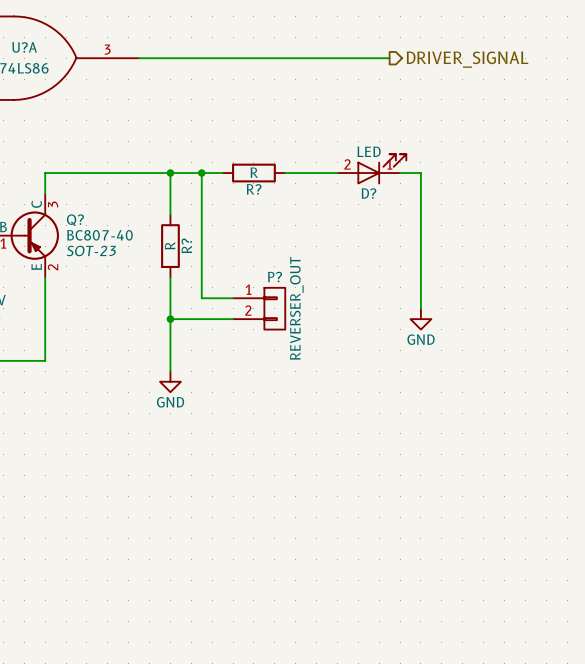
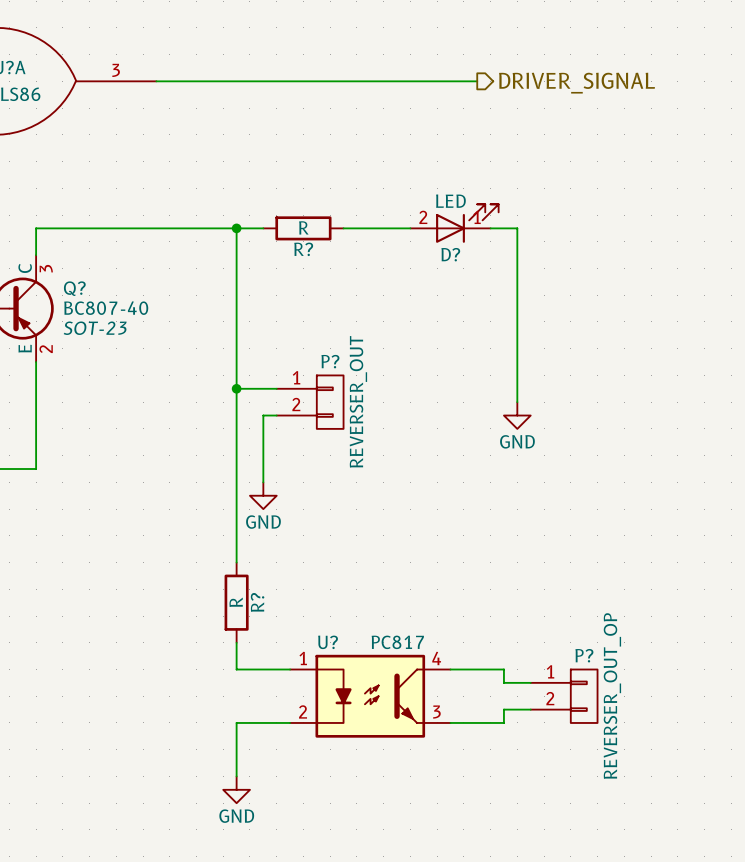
wire: (170, 173) (170, 214) -> none
junction: (170, 173) -> none
R?: R (170, 246) -> none
wire: (170, 277) (170, 371) -> none
wire: none -> (236, 388) (236, 562)
wire: (170, 319) (222, 319) -> (263, 482) (263, 415)
junction position: (170, 319) -> (236, 388)
power symbol position: GND (170, 381) -> GND (263, 495)
R?: none -> R (236, 602)
wire: none -> (236, 642) (236, 669) (290, 669)
wire: none -> (450, 669) (503, 669) (503, 682) (530, 682)
U?: none -> PC817 (370, 696)
P?: none -> REVERSER_OUT_OP (564, 696)
wire: none -> (530, 709) (503, 709) (503, 722) (450, 722)
wire: none -> (290, 722) (236, 722) (236, 776)
power symbol: none -> GND (236, 789)

